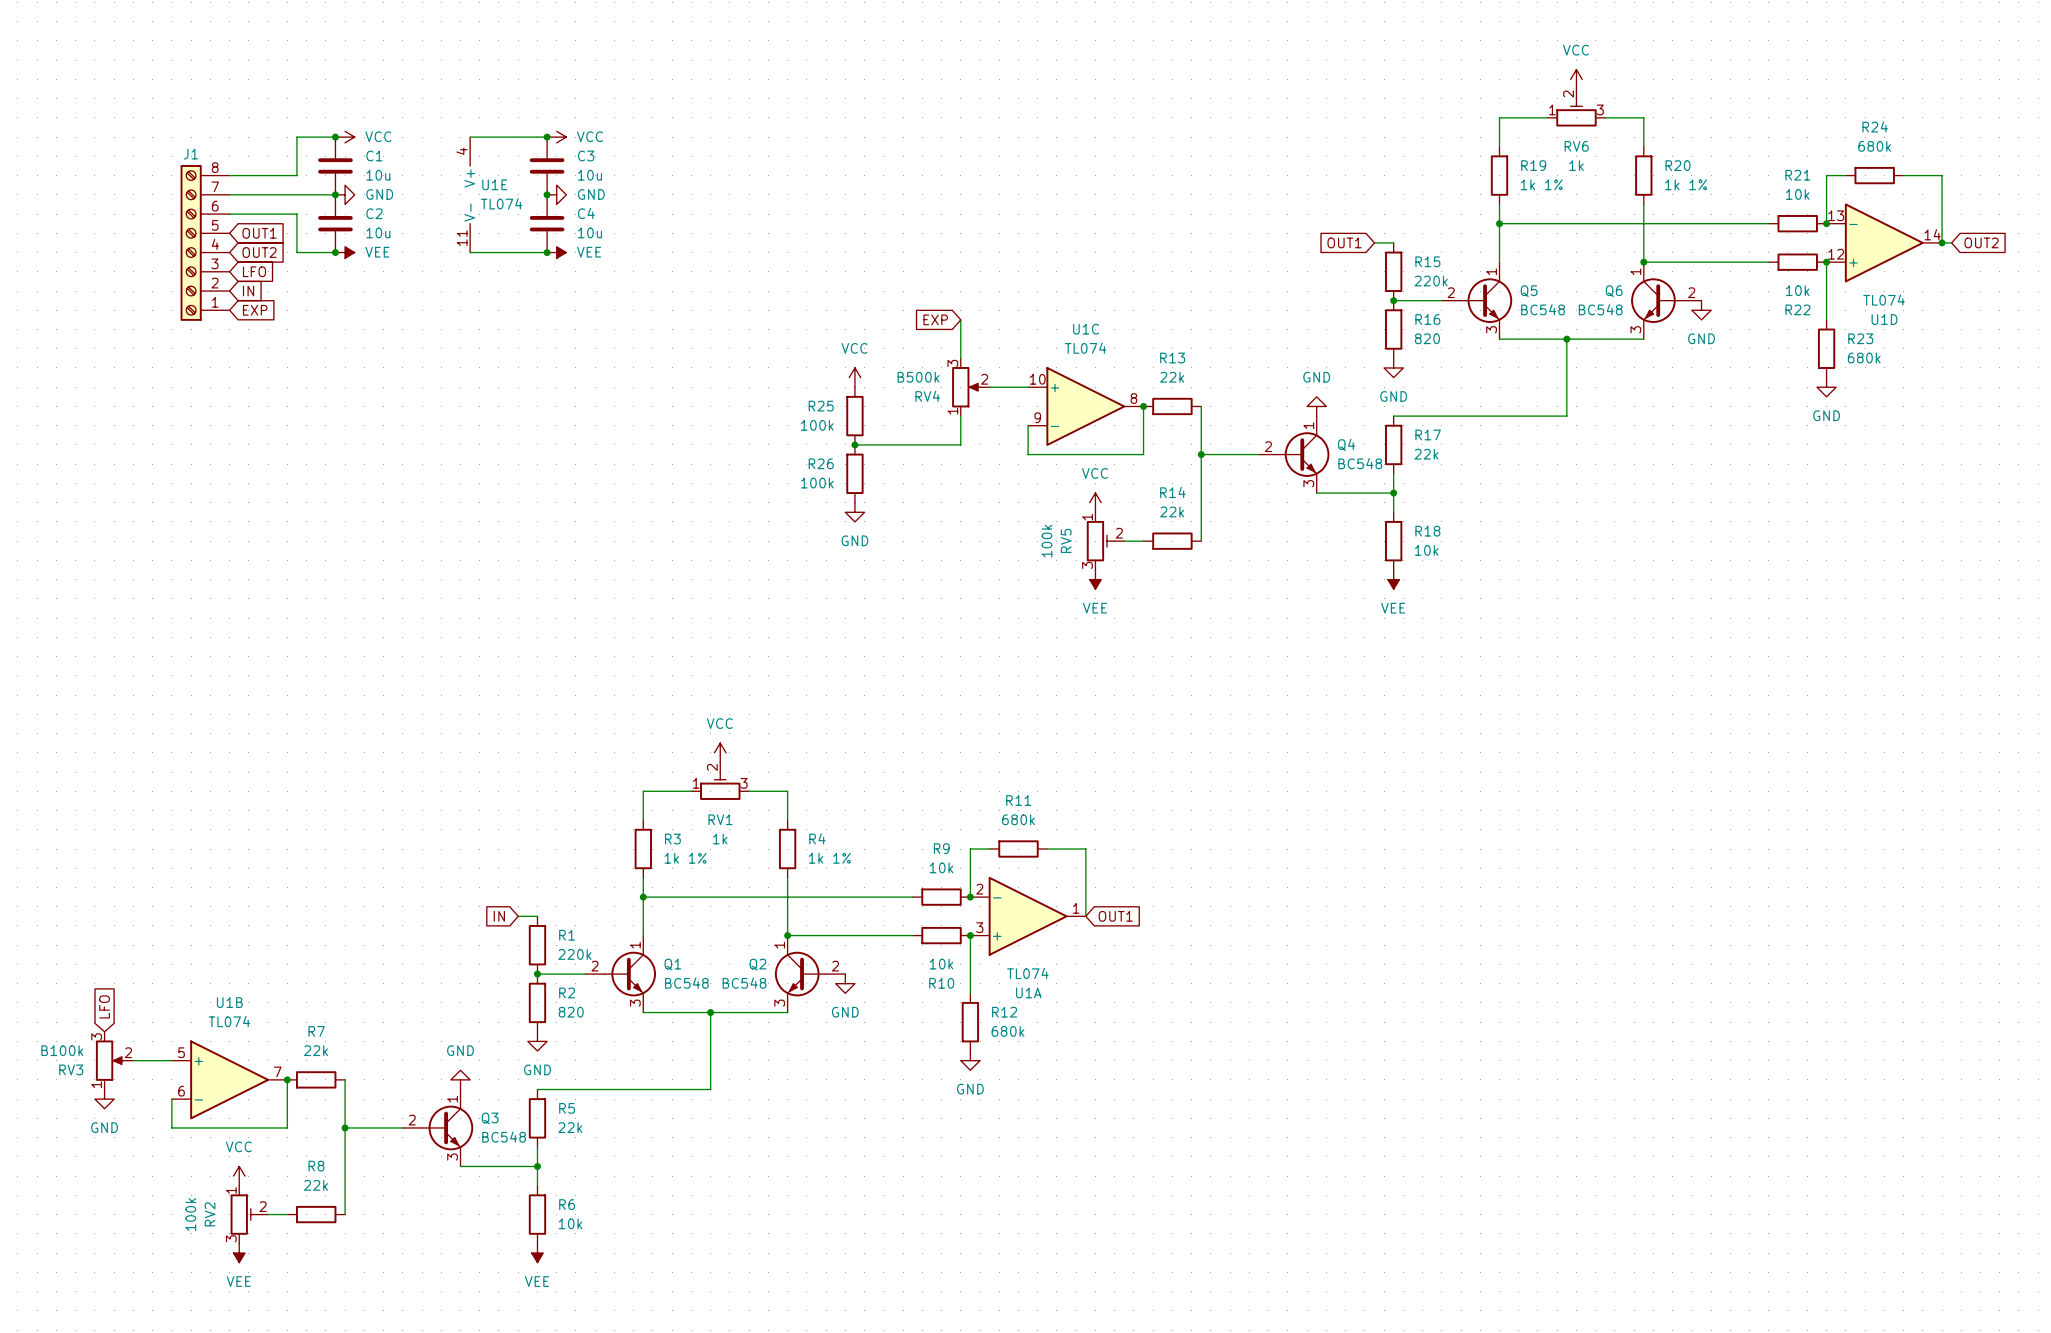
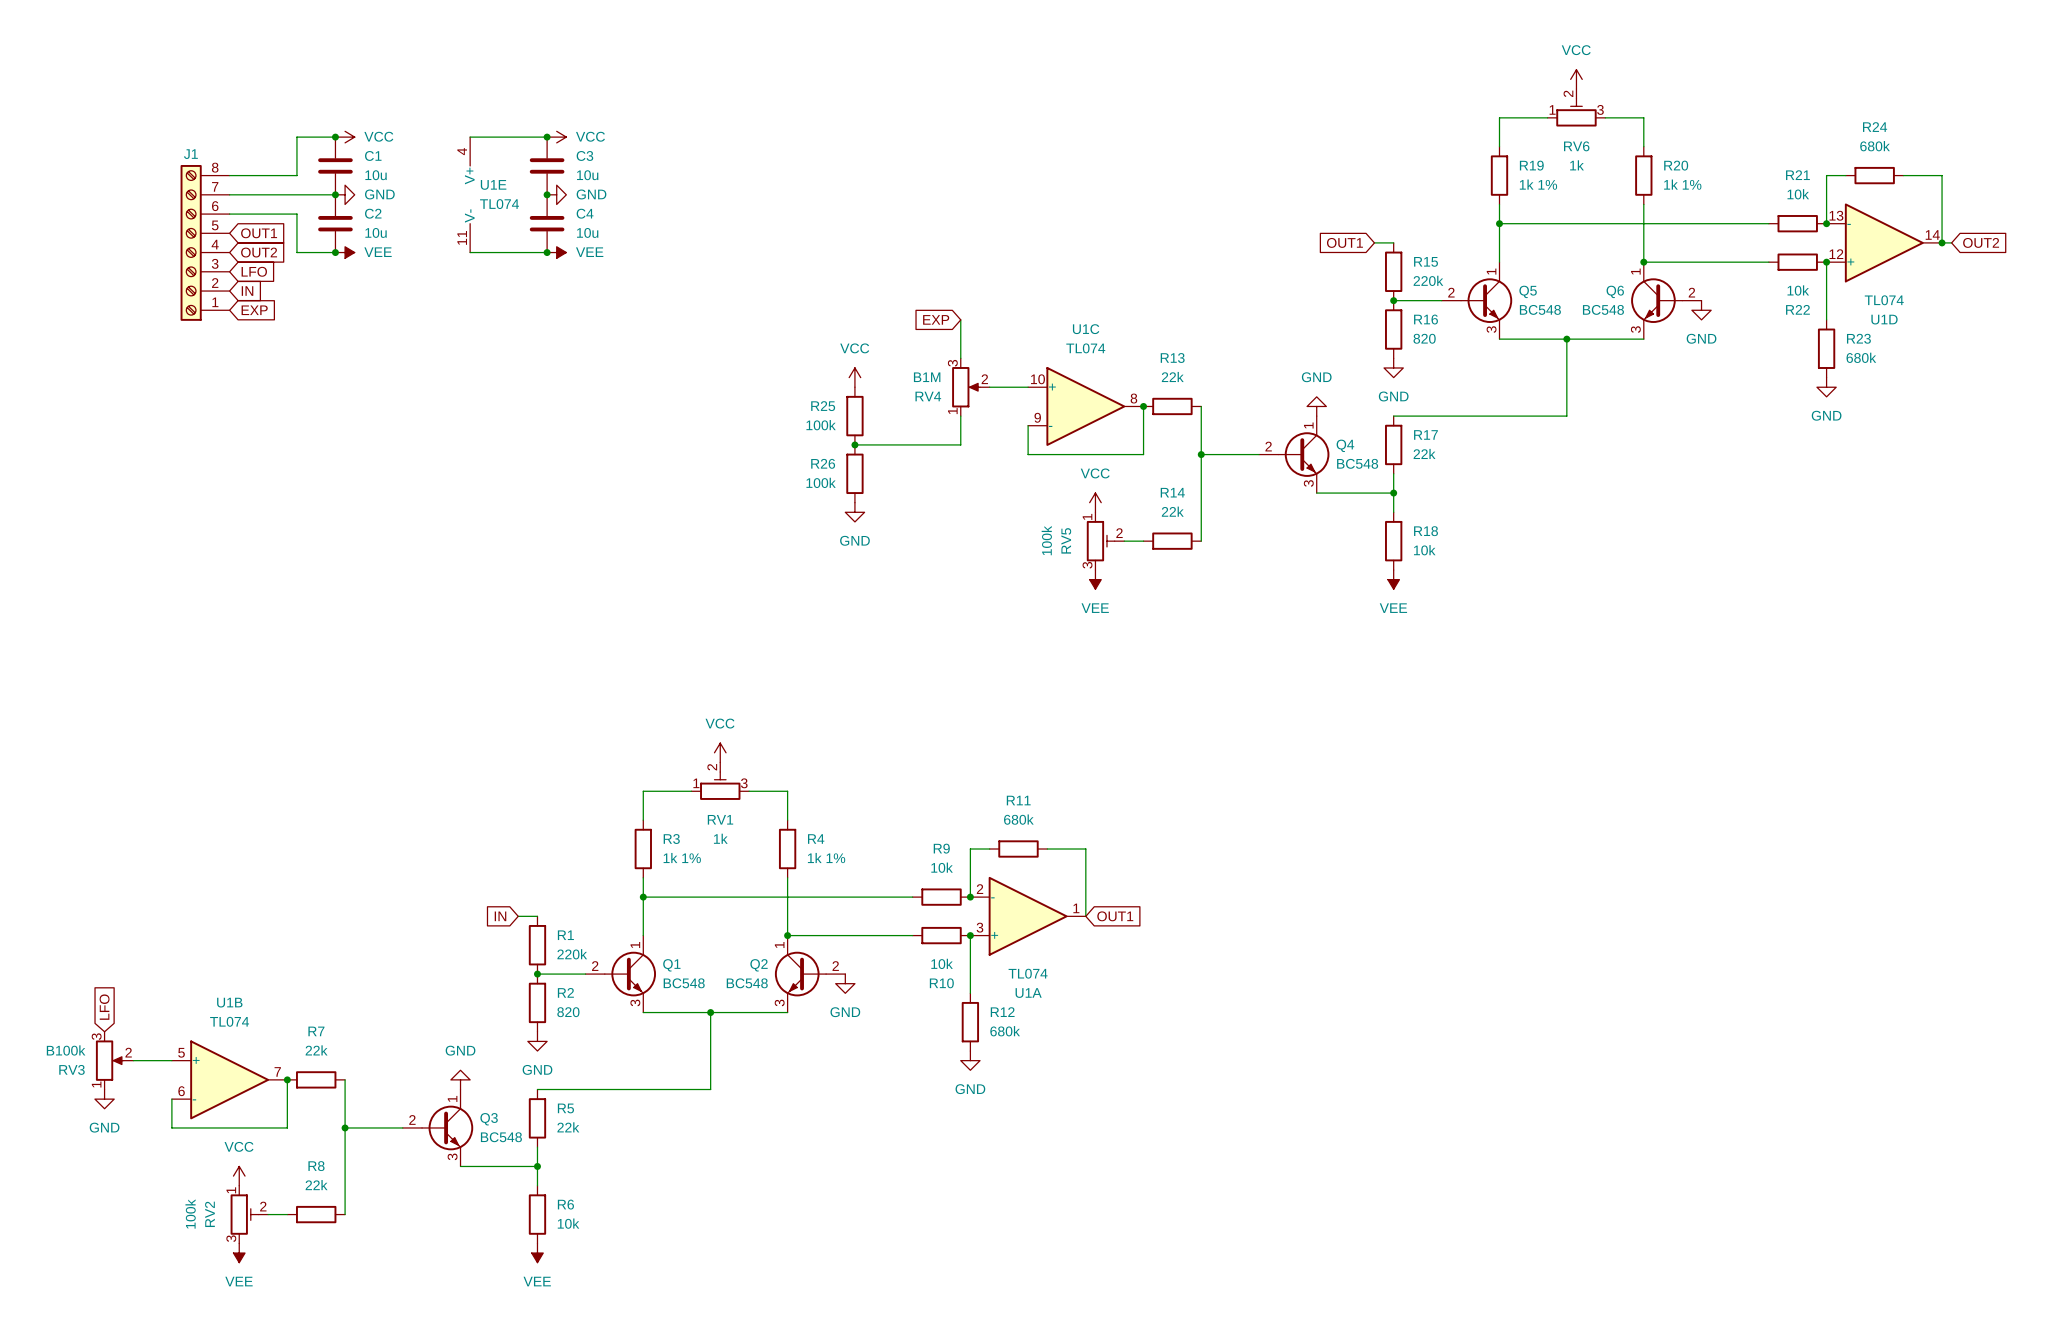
RV4 value: B500k (918, 377) -> B1M (927, 377)

